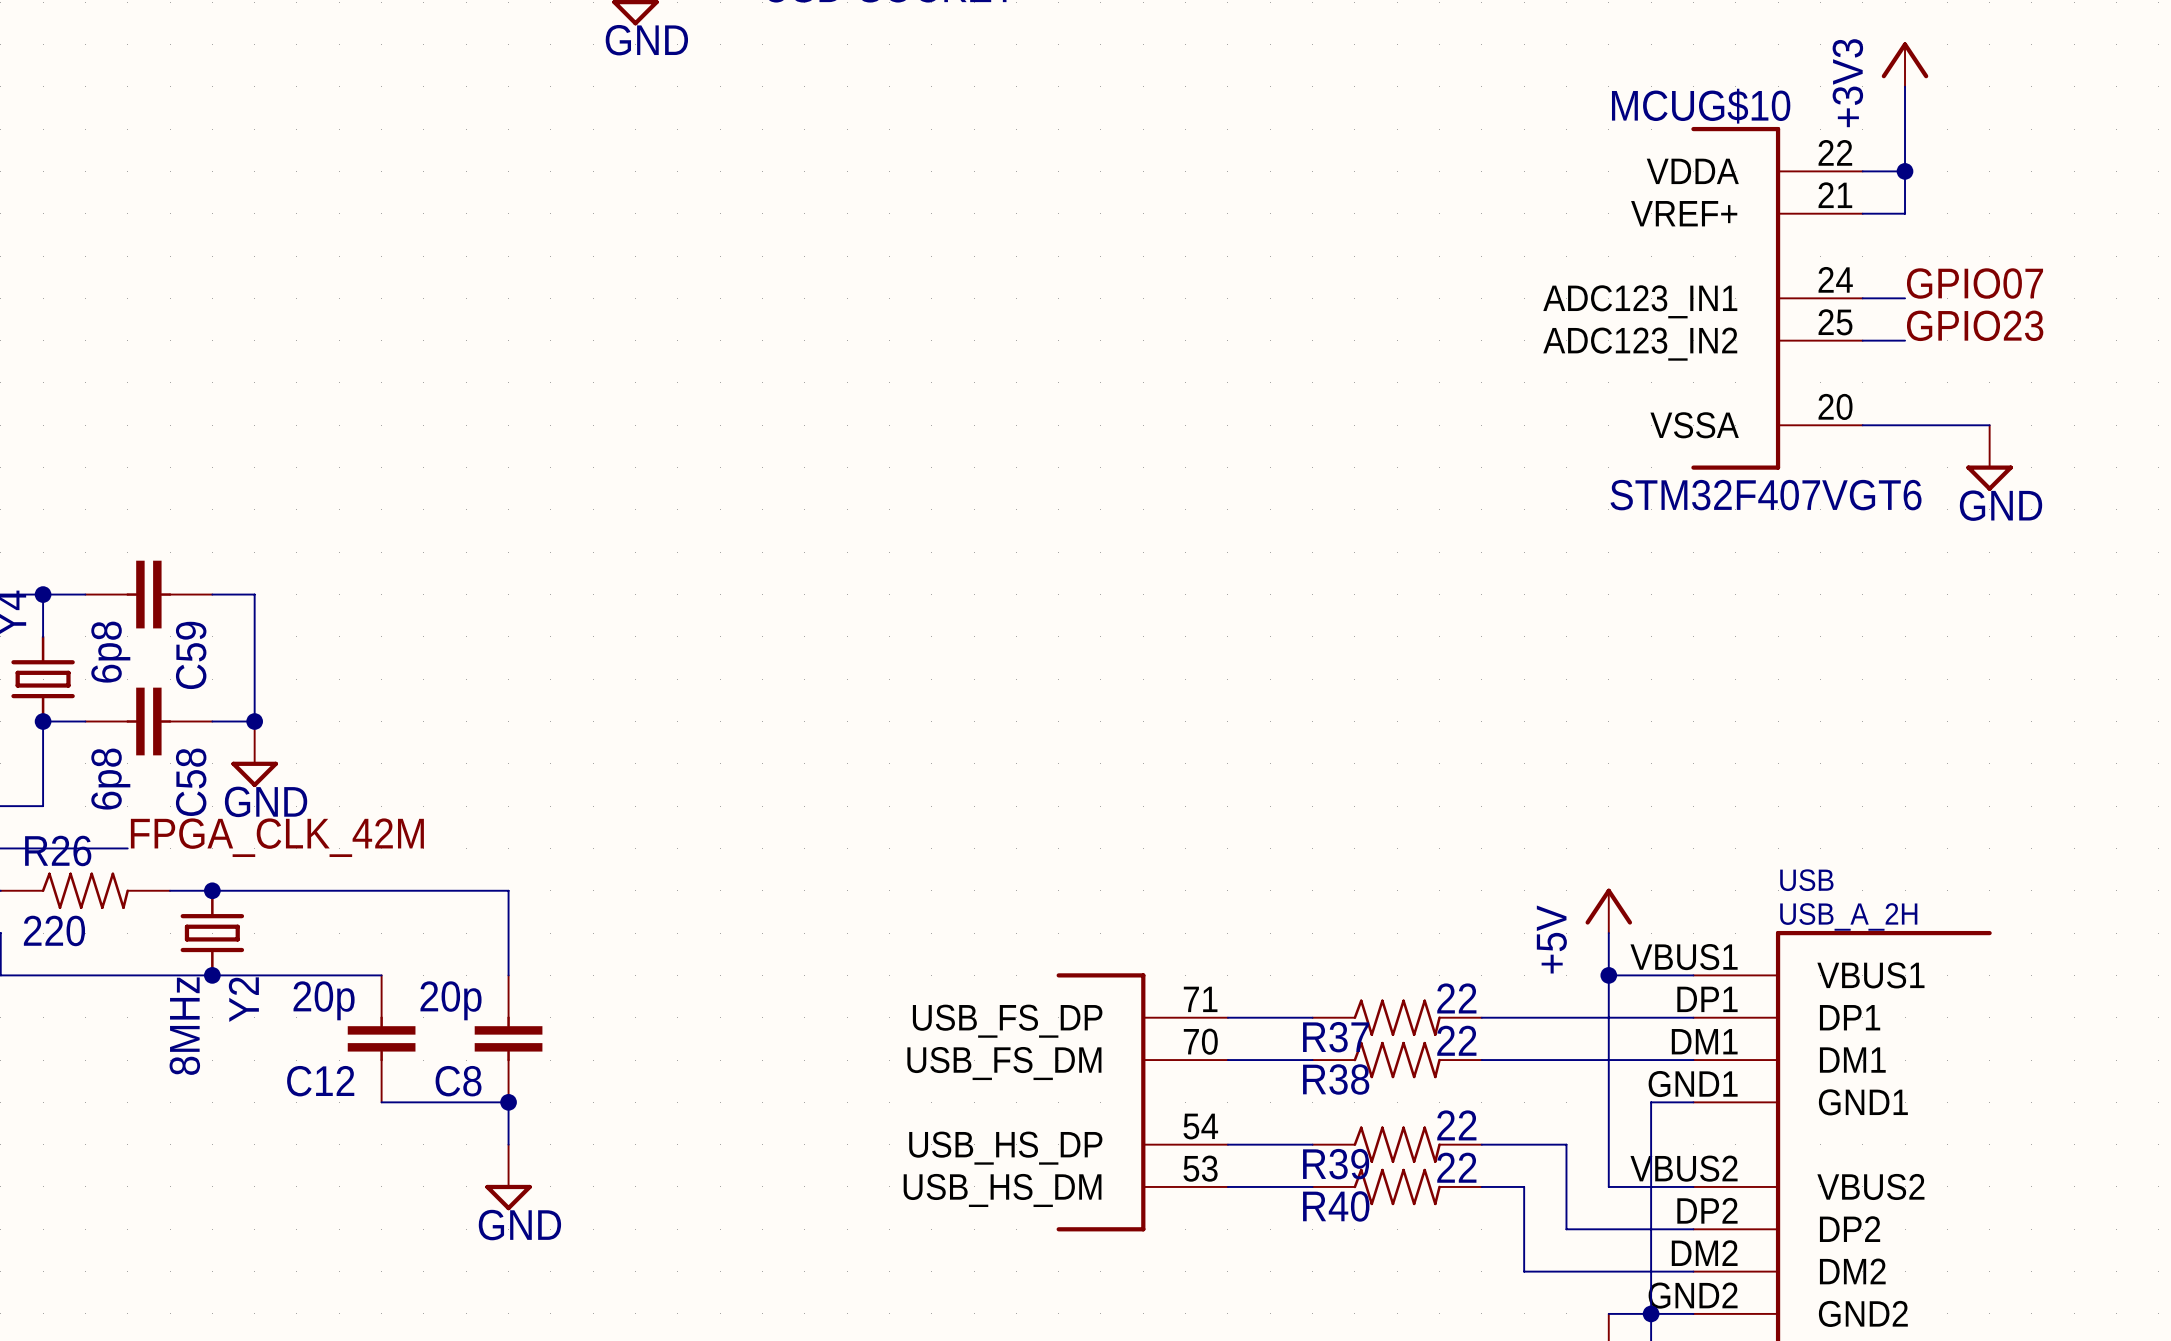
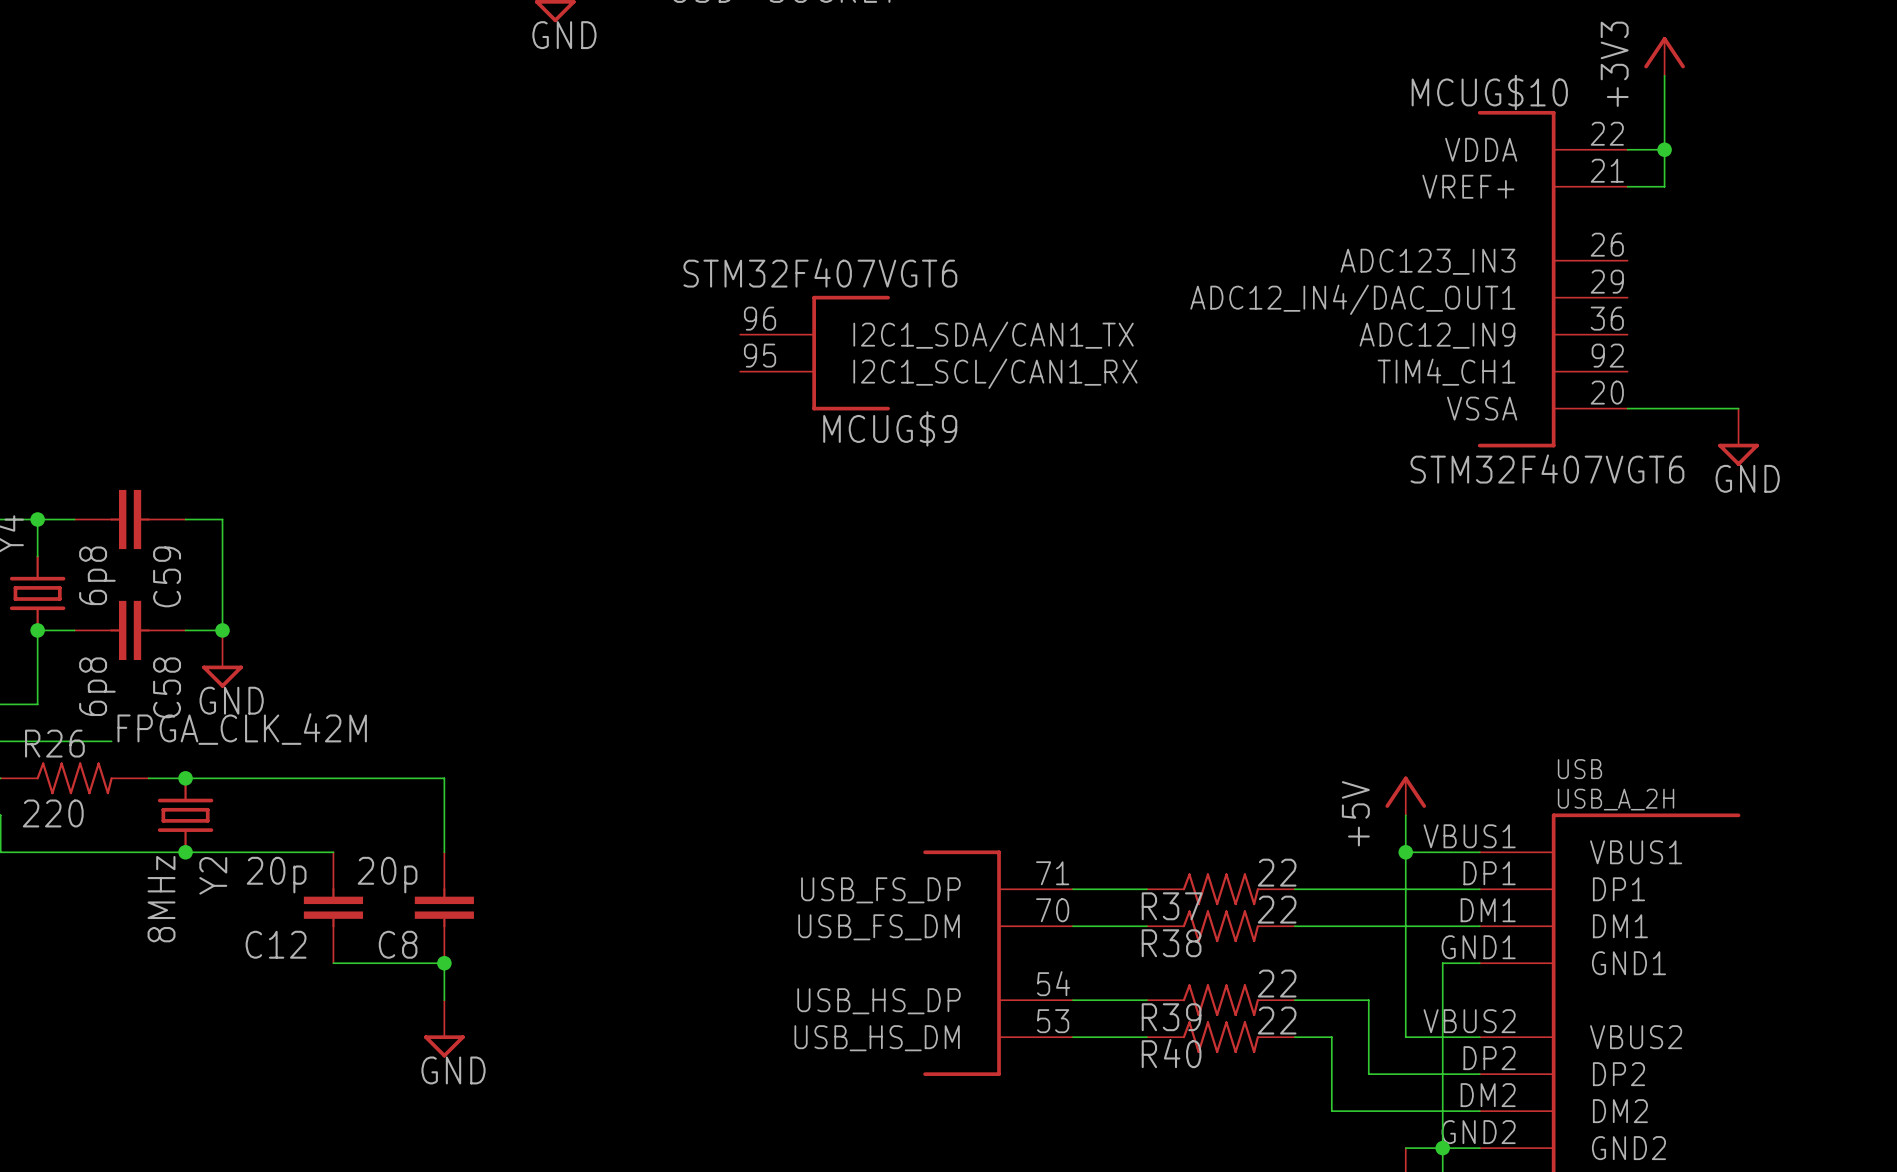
MCUG$10 symbol: [1691, 126, 1863, 470] -> [1477, 110, 1628, 448]
label: GPIO07 (1975, 283) -> none
wire: (1862, 298) (1905, 298) -> none
label: GPIO23 (1975, 325) -> none
wire: (1862, 340) (1905, 340) -> none
MCUG$9: none -> STM32F407VGT6 (815, 353)
wire: (1862, 425) (1989, 425) -> (1627, 408) (1738, 408)
power symbol position: GND (1989, 458) -> GND (1738, 437)

